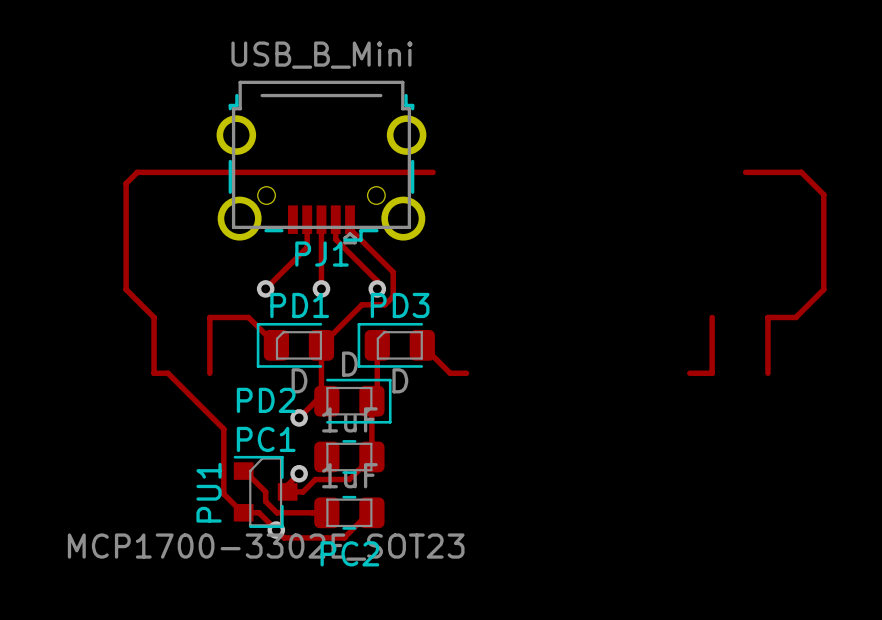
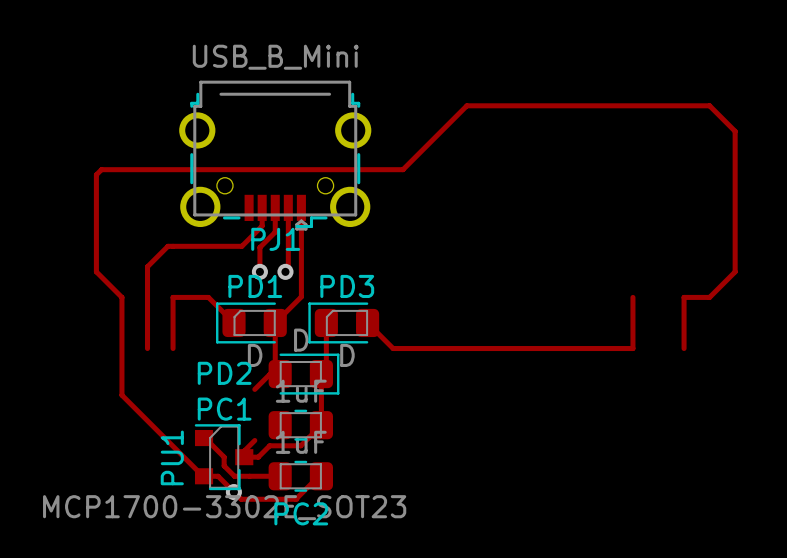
track: (433, 172) (137, 172) (131, 177) -> (735, 185) (735, 131) (709, 105) (466, 105) (403, 169) (101, 169)
track: (745, 172) (801, 172) (823, 194) -> none
track: (350, 229) (393, 272) (393, 296) (384, 304) (362, 304) (350, 316) -> (301, 216) (301, 296)
track: (307, 239) (307, 247) (265, 288) -> (262, 226) (241, 246) (167, 246) (147, 266) (147, 348)
track: (335, 239) (377, 280) (377, 288) -> (288, 226) (288, 269) (285, 271)
track: (321, 246) (321, 288) -> (275, 232) (259, 247) (259, 271)
via: (265, 288) -> none
via: (321, 288) -> none
via: (377, 288) -> none
via: none -> (259, 271)
via: none -> (285, 271)
track: (154, 373) (167, 373) (223, 429) (223, 494) -> (121, 348) (121, 395) (185, 459)
track: none -> (408, 348) (612, 348)
via: (299, 417) -> none
via: (299, 473) -> none

